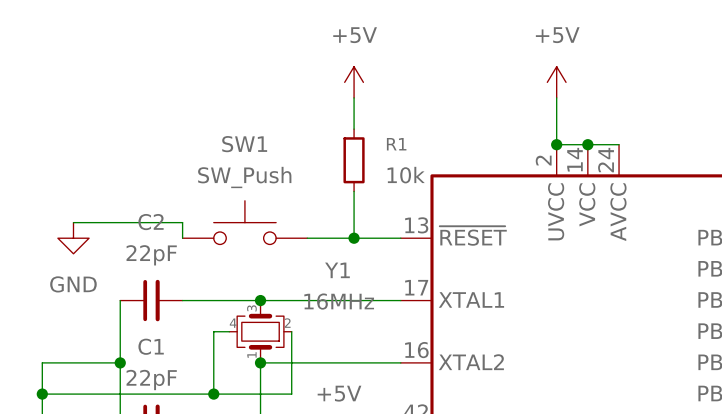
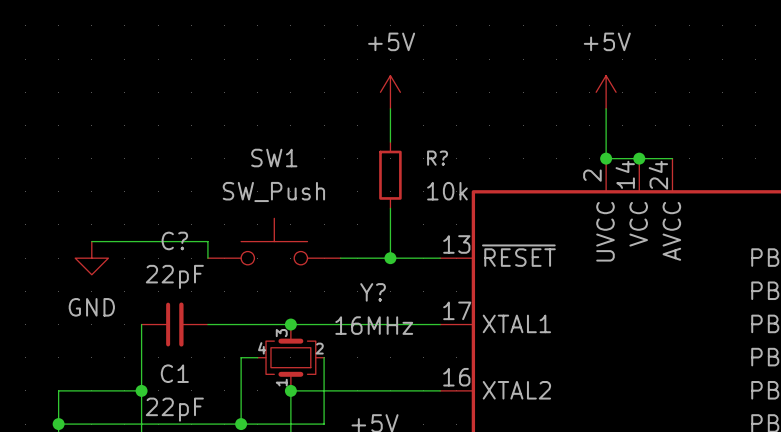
R1 name: R1 (396, 144) -> R? (437, 158)
C2 name: C2 (151, 222) -> C? (174, 240)
Y1 name: Y1 (337, 270) -> Y? (373, 292)

